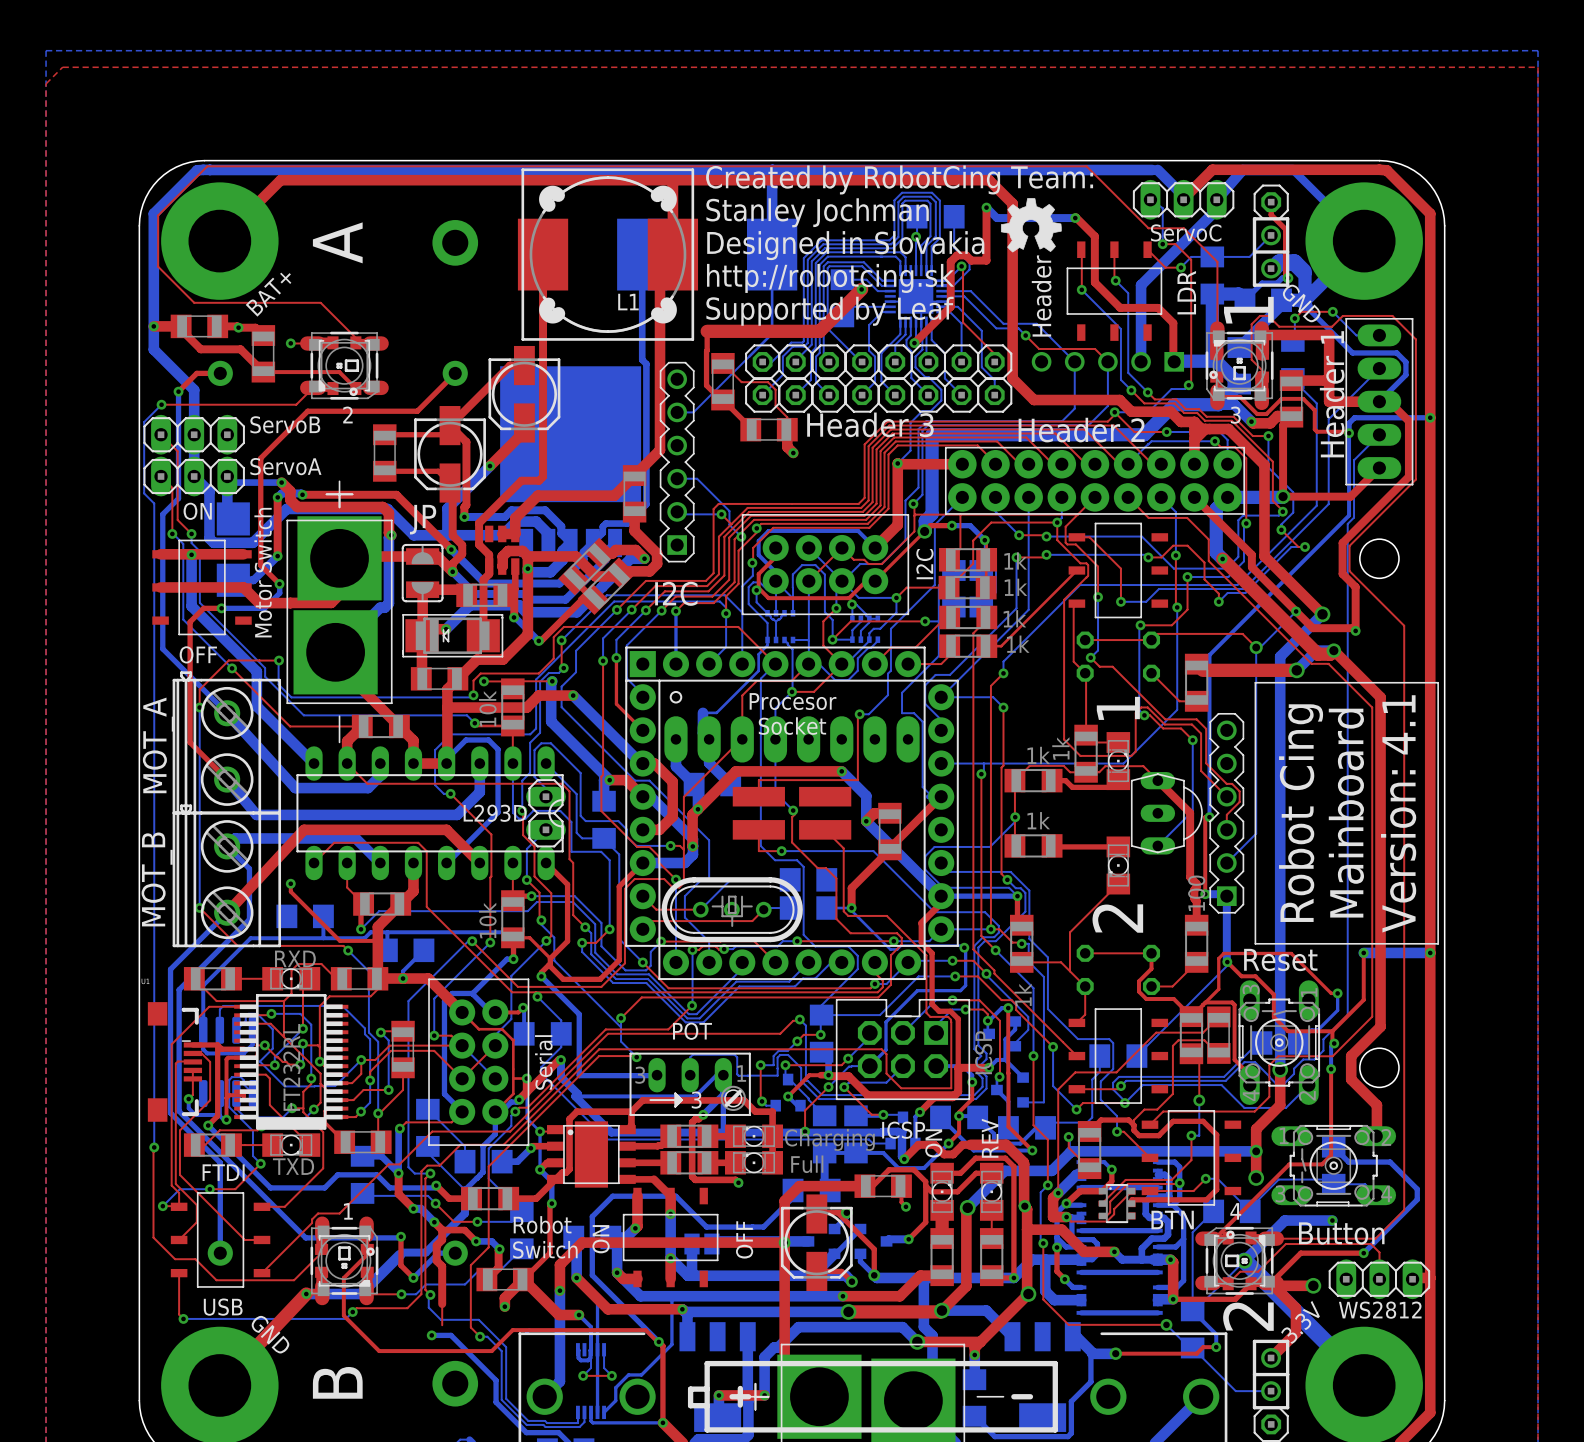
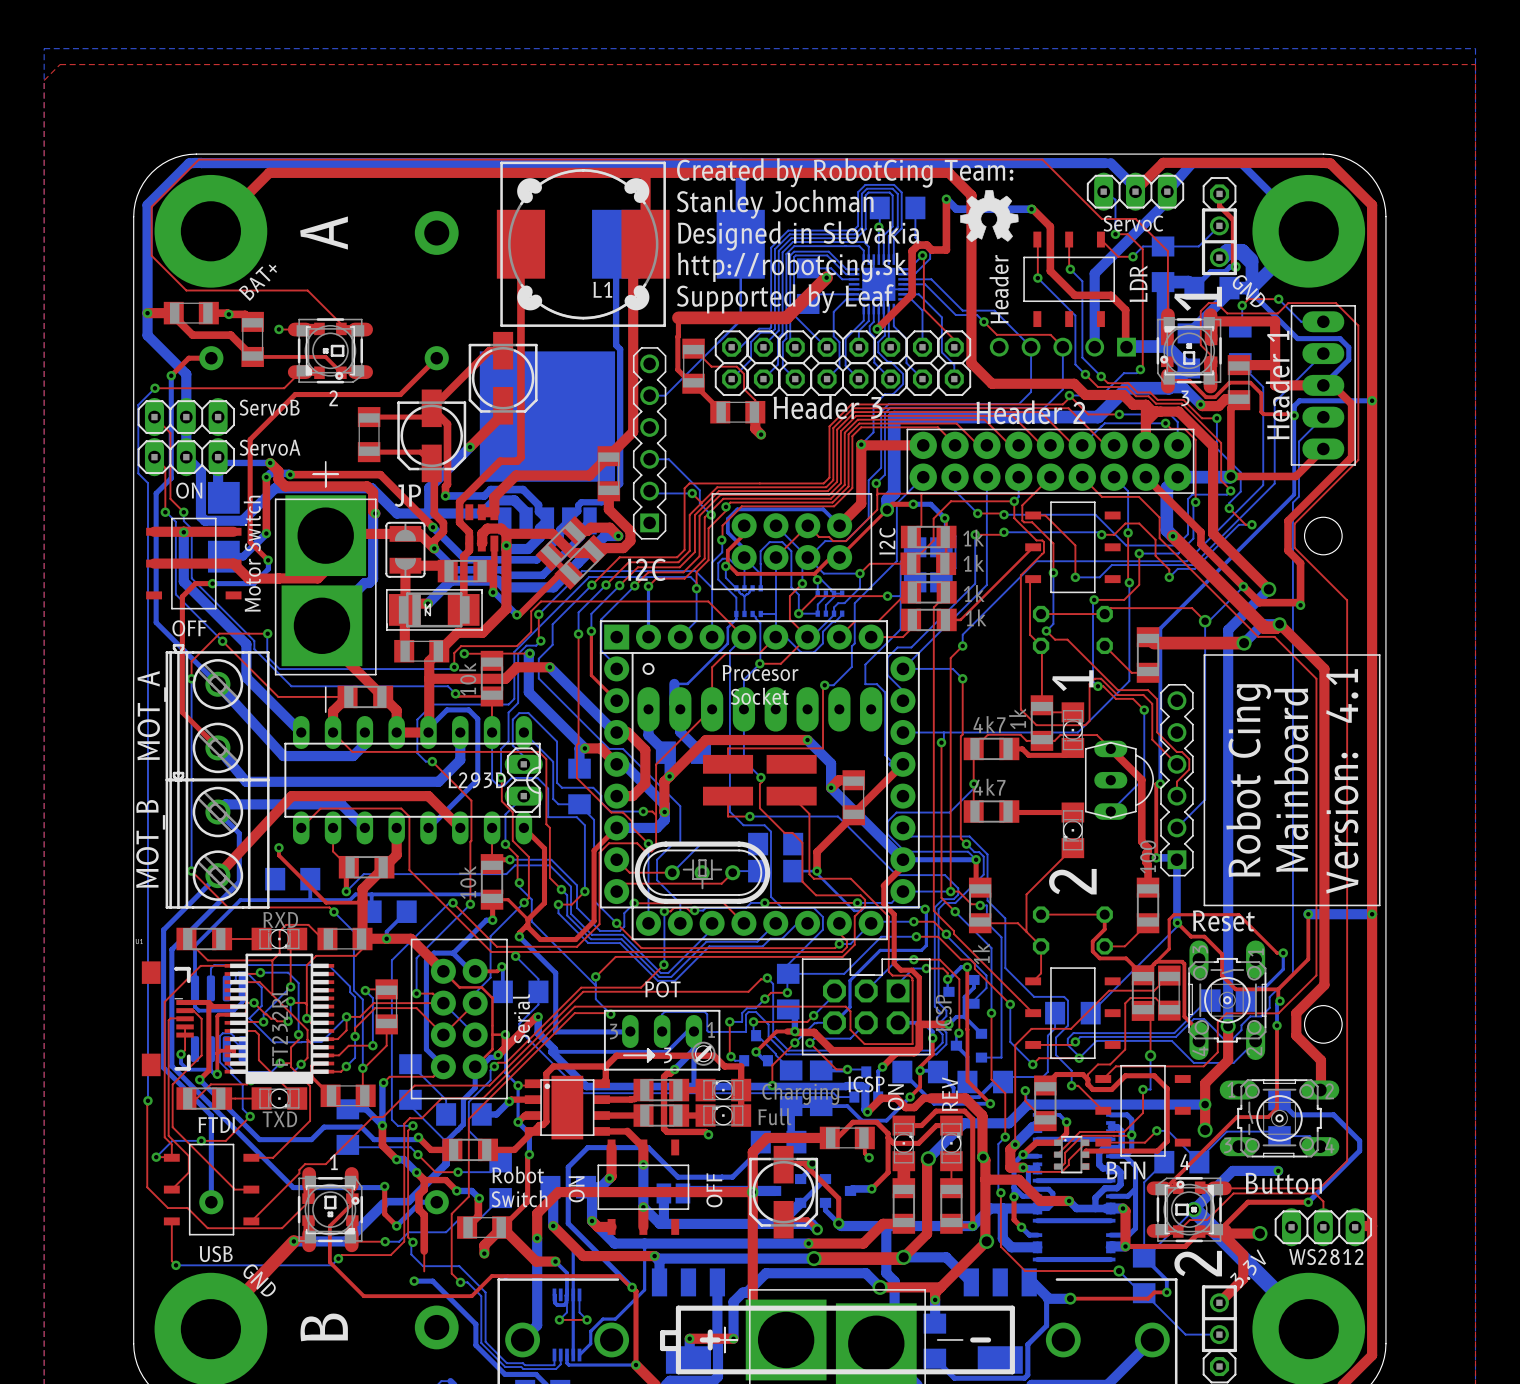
part value: 1k (1038, 755) -> 4k7 (989, 724)
part value: 1k (1038, 820) -> 4k7 (989, 787)

